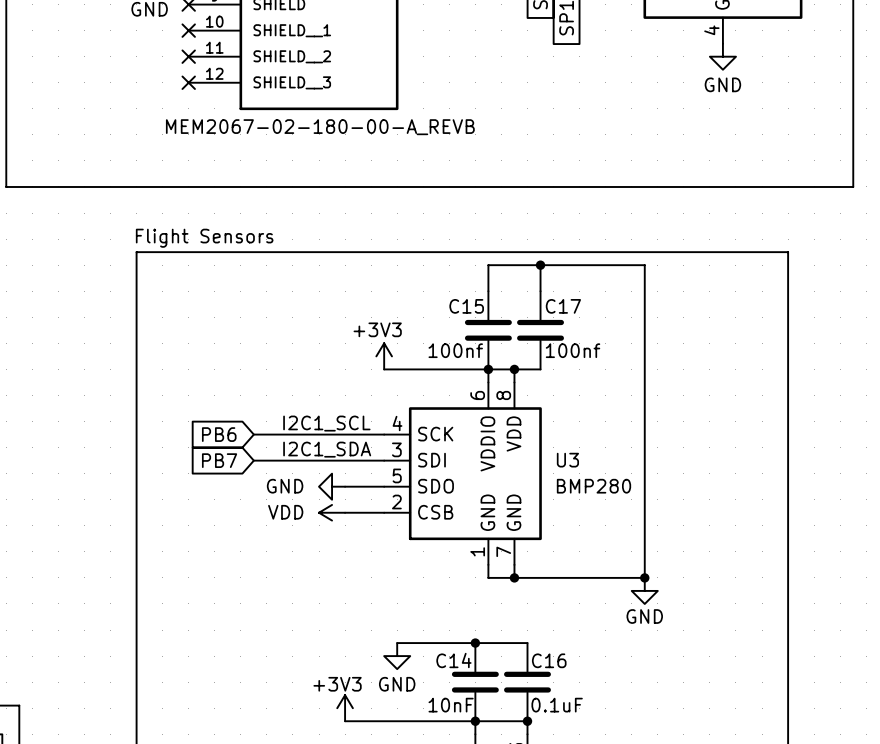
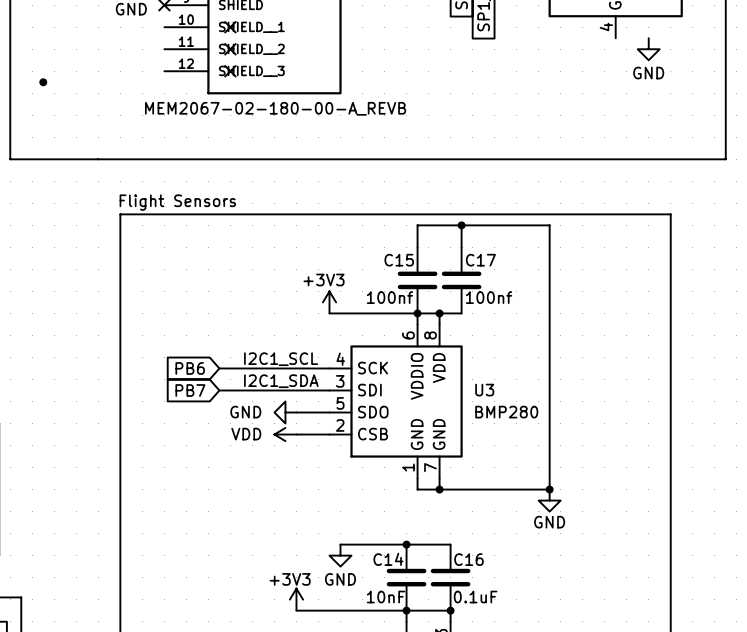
no-connect mark: (188, 30) -> none
no-connect mark: none -> (230, 27)
no-connect mark: (188, 56) -> none
no-connect mark: none -> (230, 49)
power symbol position: GND (722, 56) -> GND (648, 49)
no-connect mark: (188, 82) -> none
no-connect mark: none -> (230, 71)
junction: none -> (43, 82)

